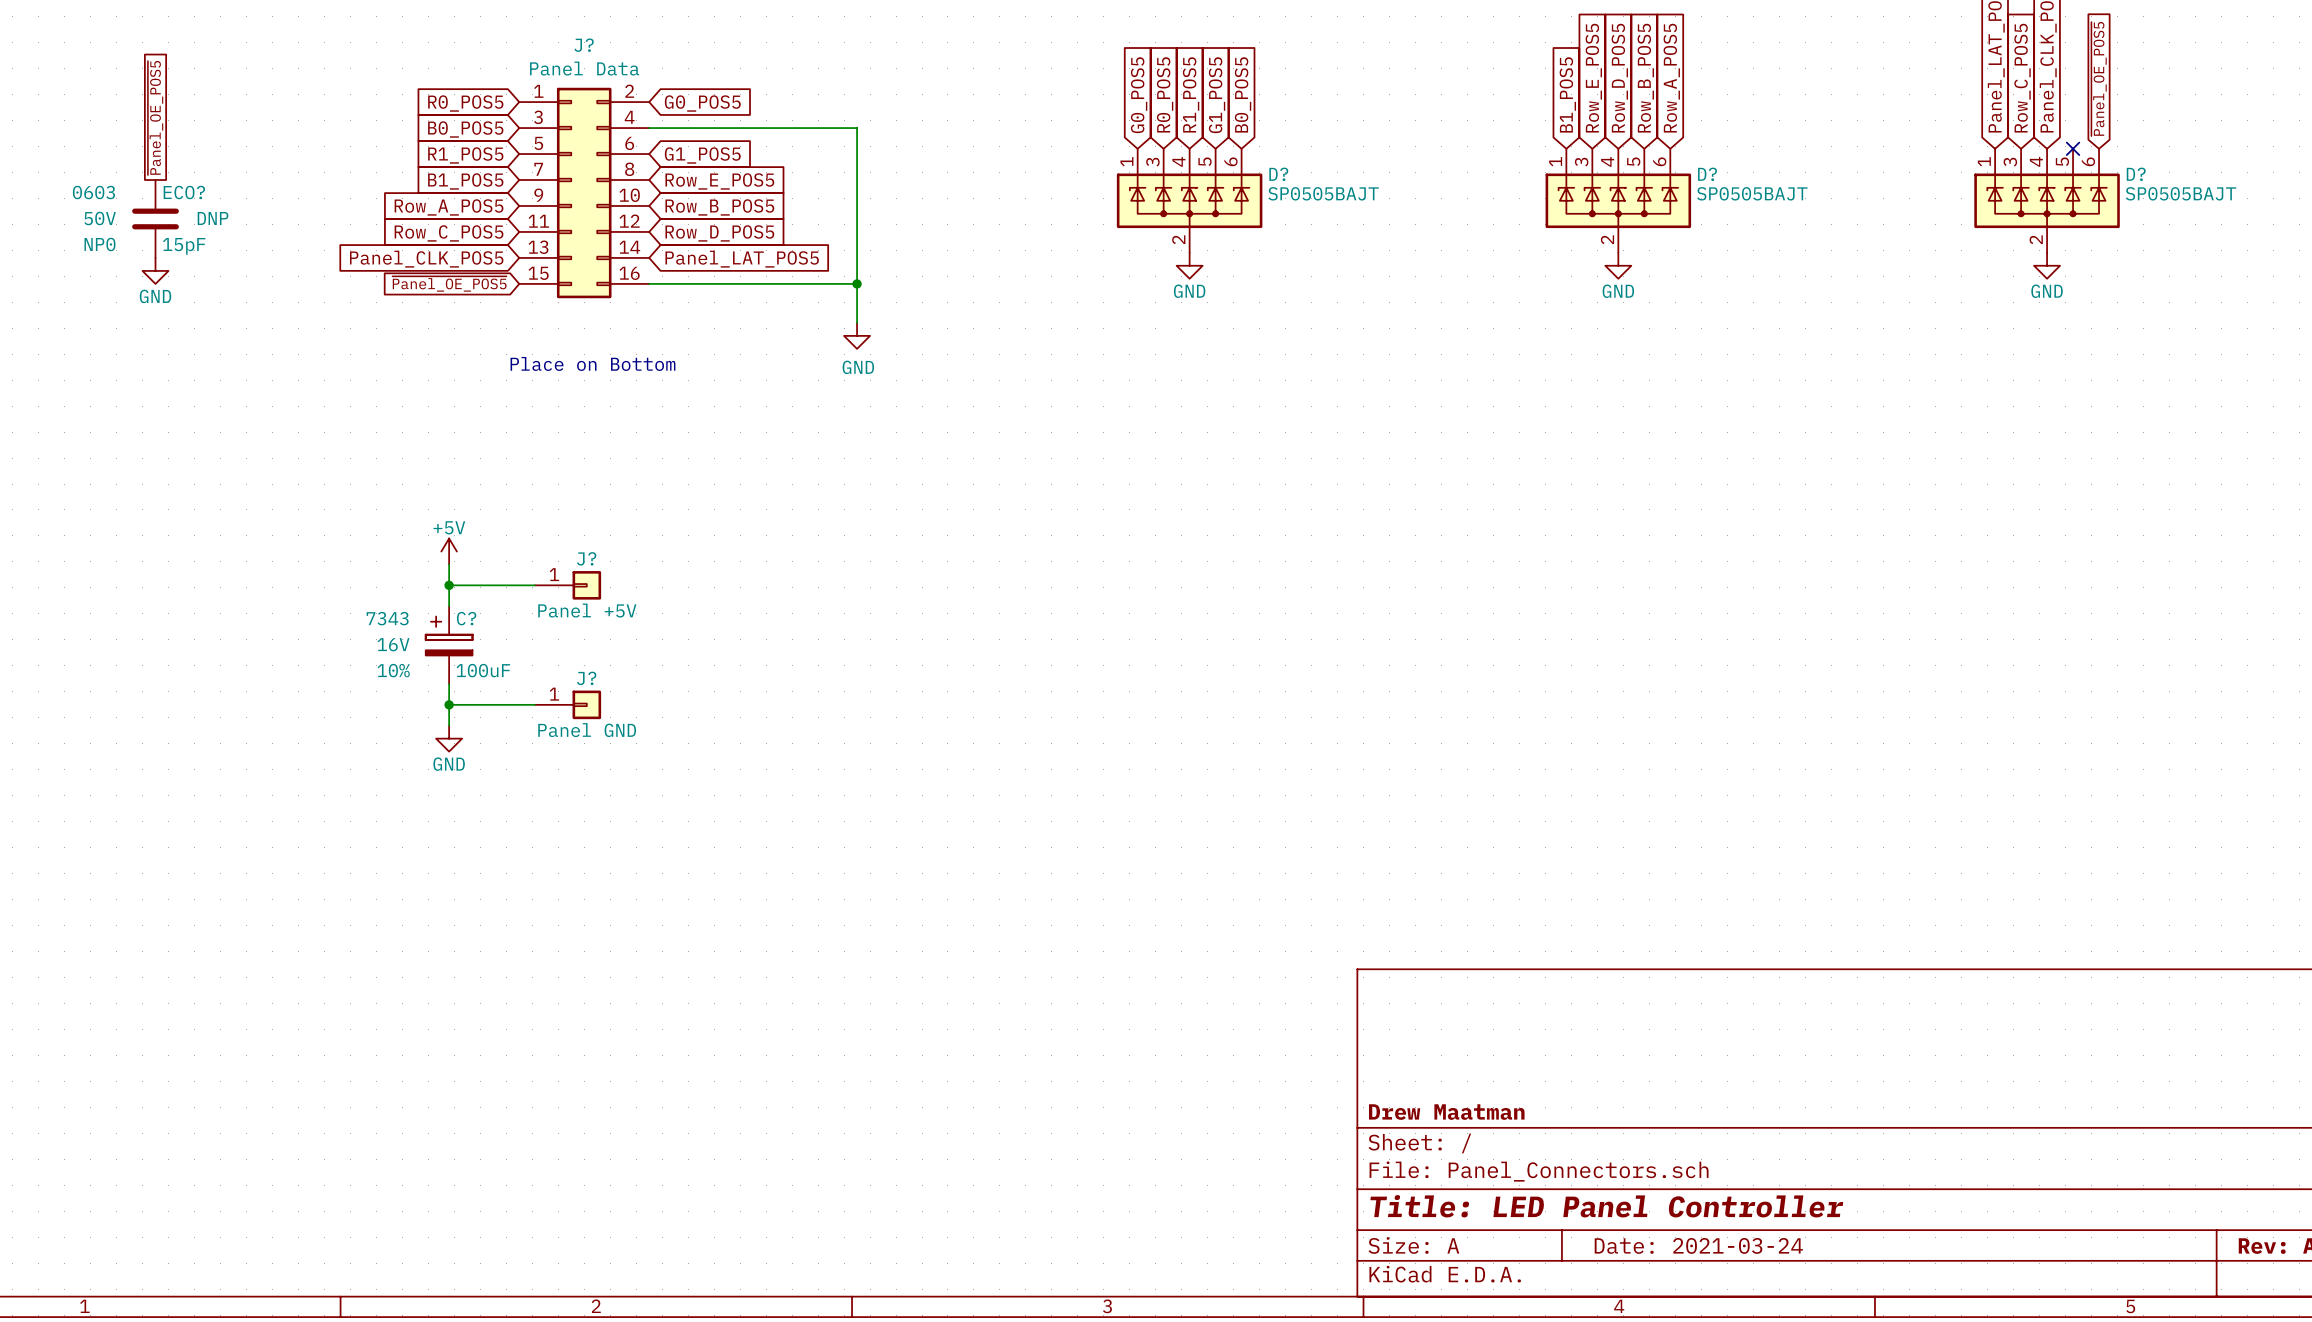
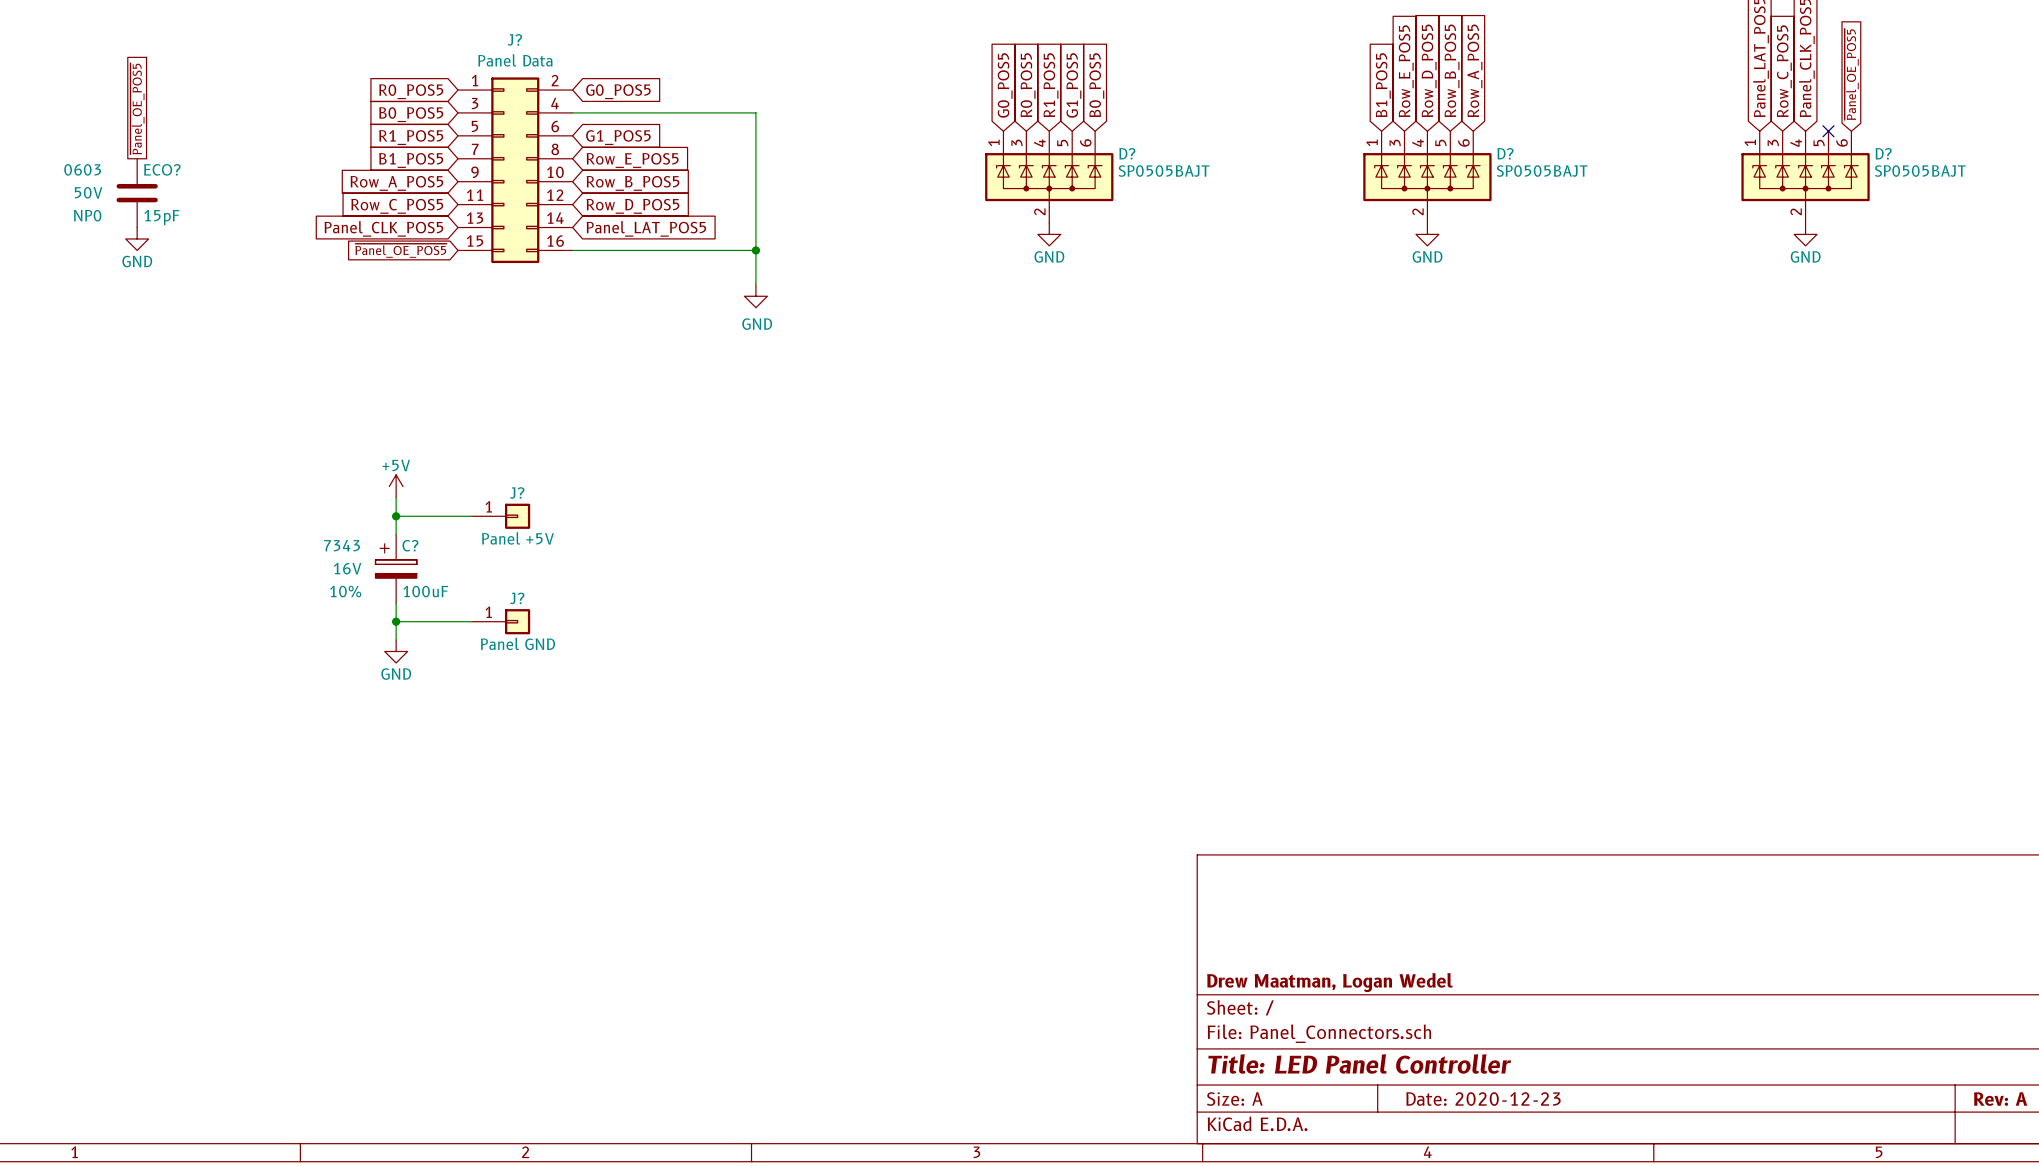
ECO? text: DNP (213, 218) -> none
text: Place on Bottom (592, 363) -> none
title block: Drew Maatman (1446, 1112) -> Drew Maatman, Logan Wedel (1329, 982)
title block: Date: 2021-03-24 (1698, 1245) -> Date: 2020-12-23 (1483, 1099)

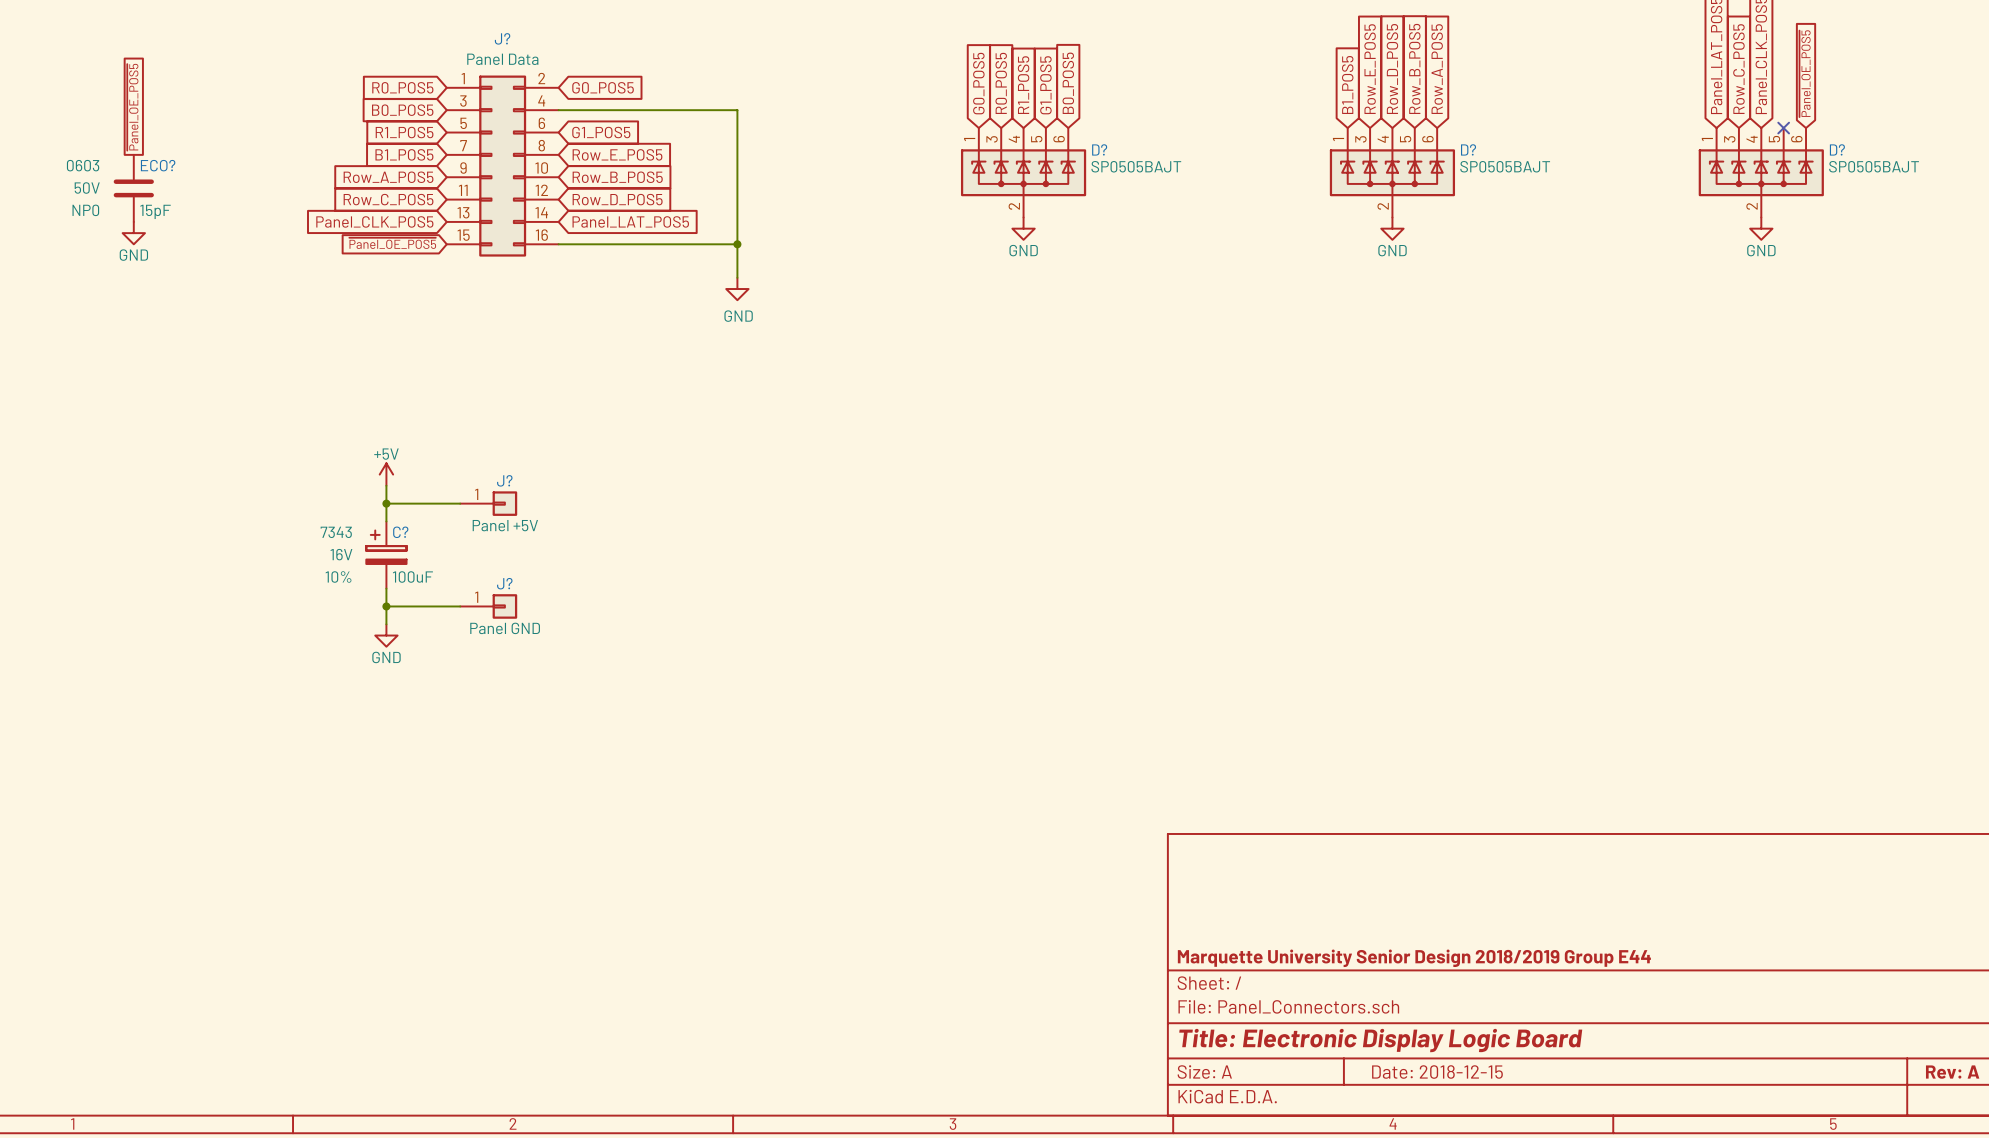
title block: Drew Maatman, Logan Wedel (1329, 982) -> Marquette University Senior Design 2018/2019 Group E44 (1414, 958)
title block: Title: LED Panel Controller (1359, 1063) -> Title: Electronic Display Logic Board (1380, 1040)
title block: Date: 2020-12-23 (1483, 1099) -> Date: 2018-12-15 (1437, 1072)

